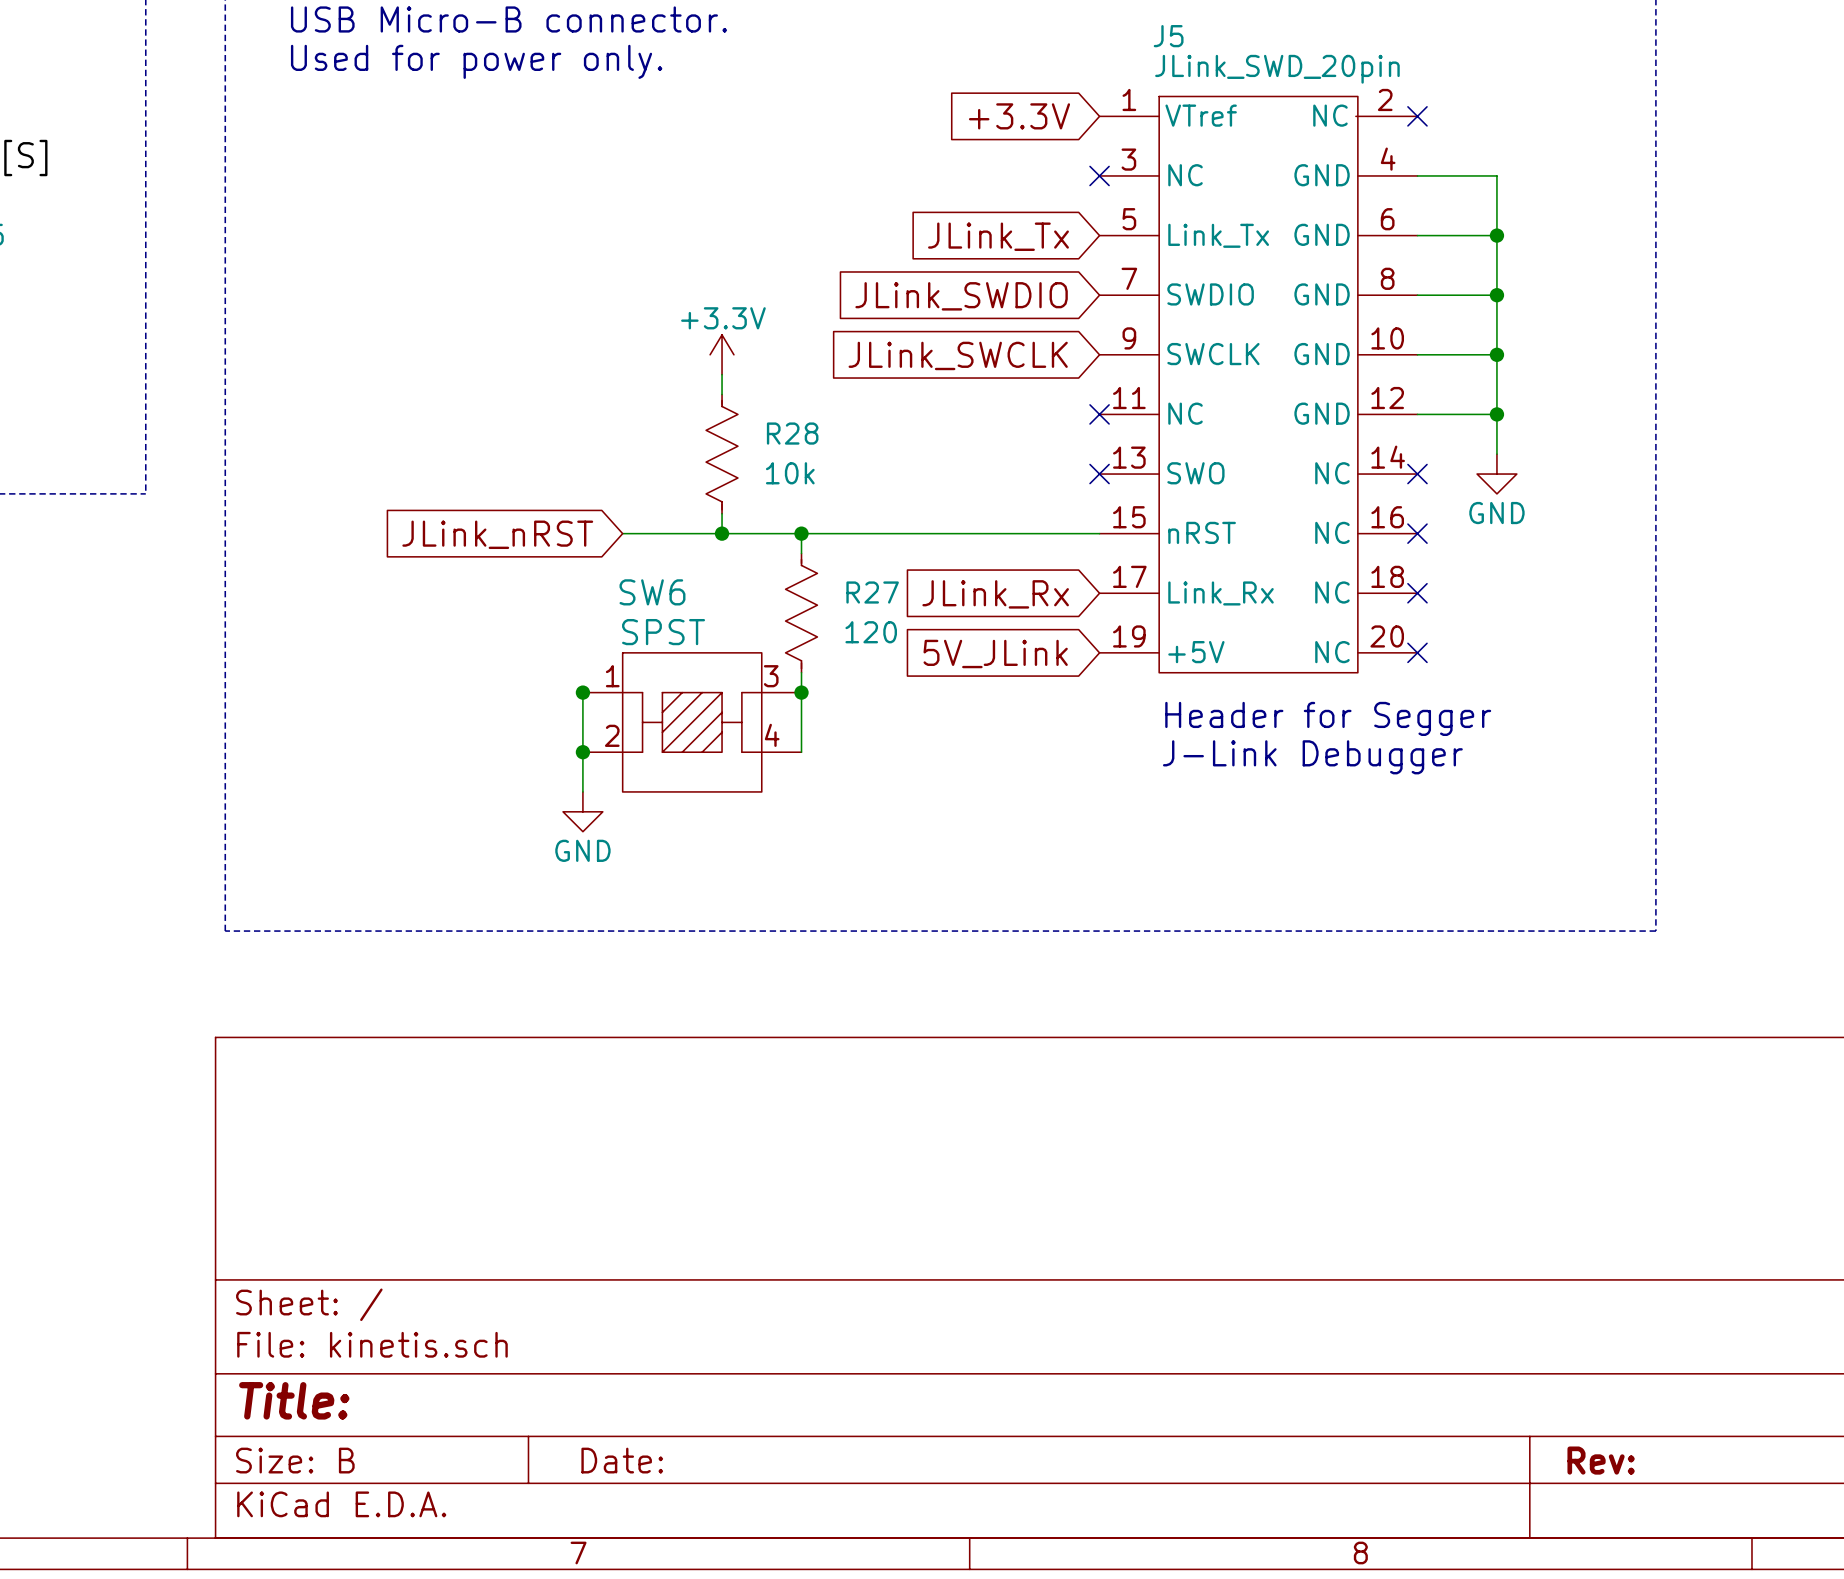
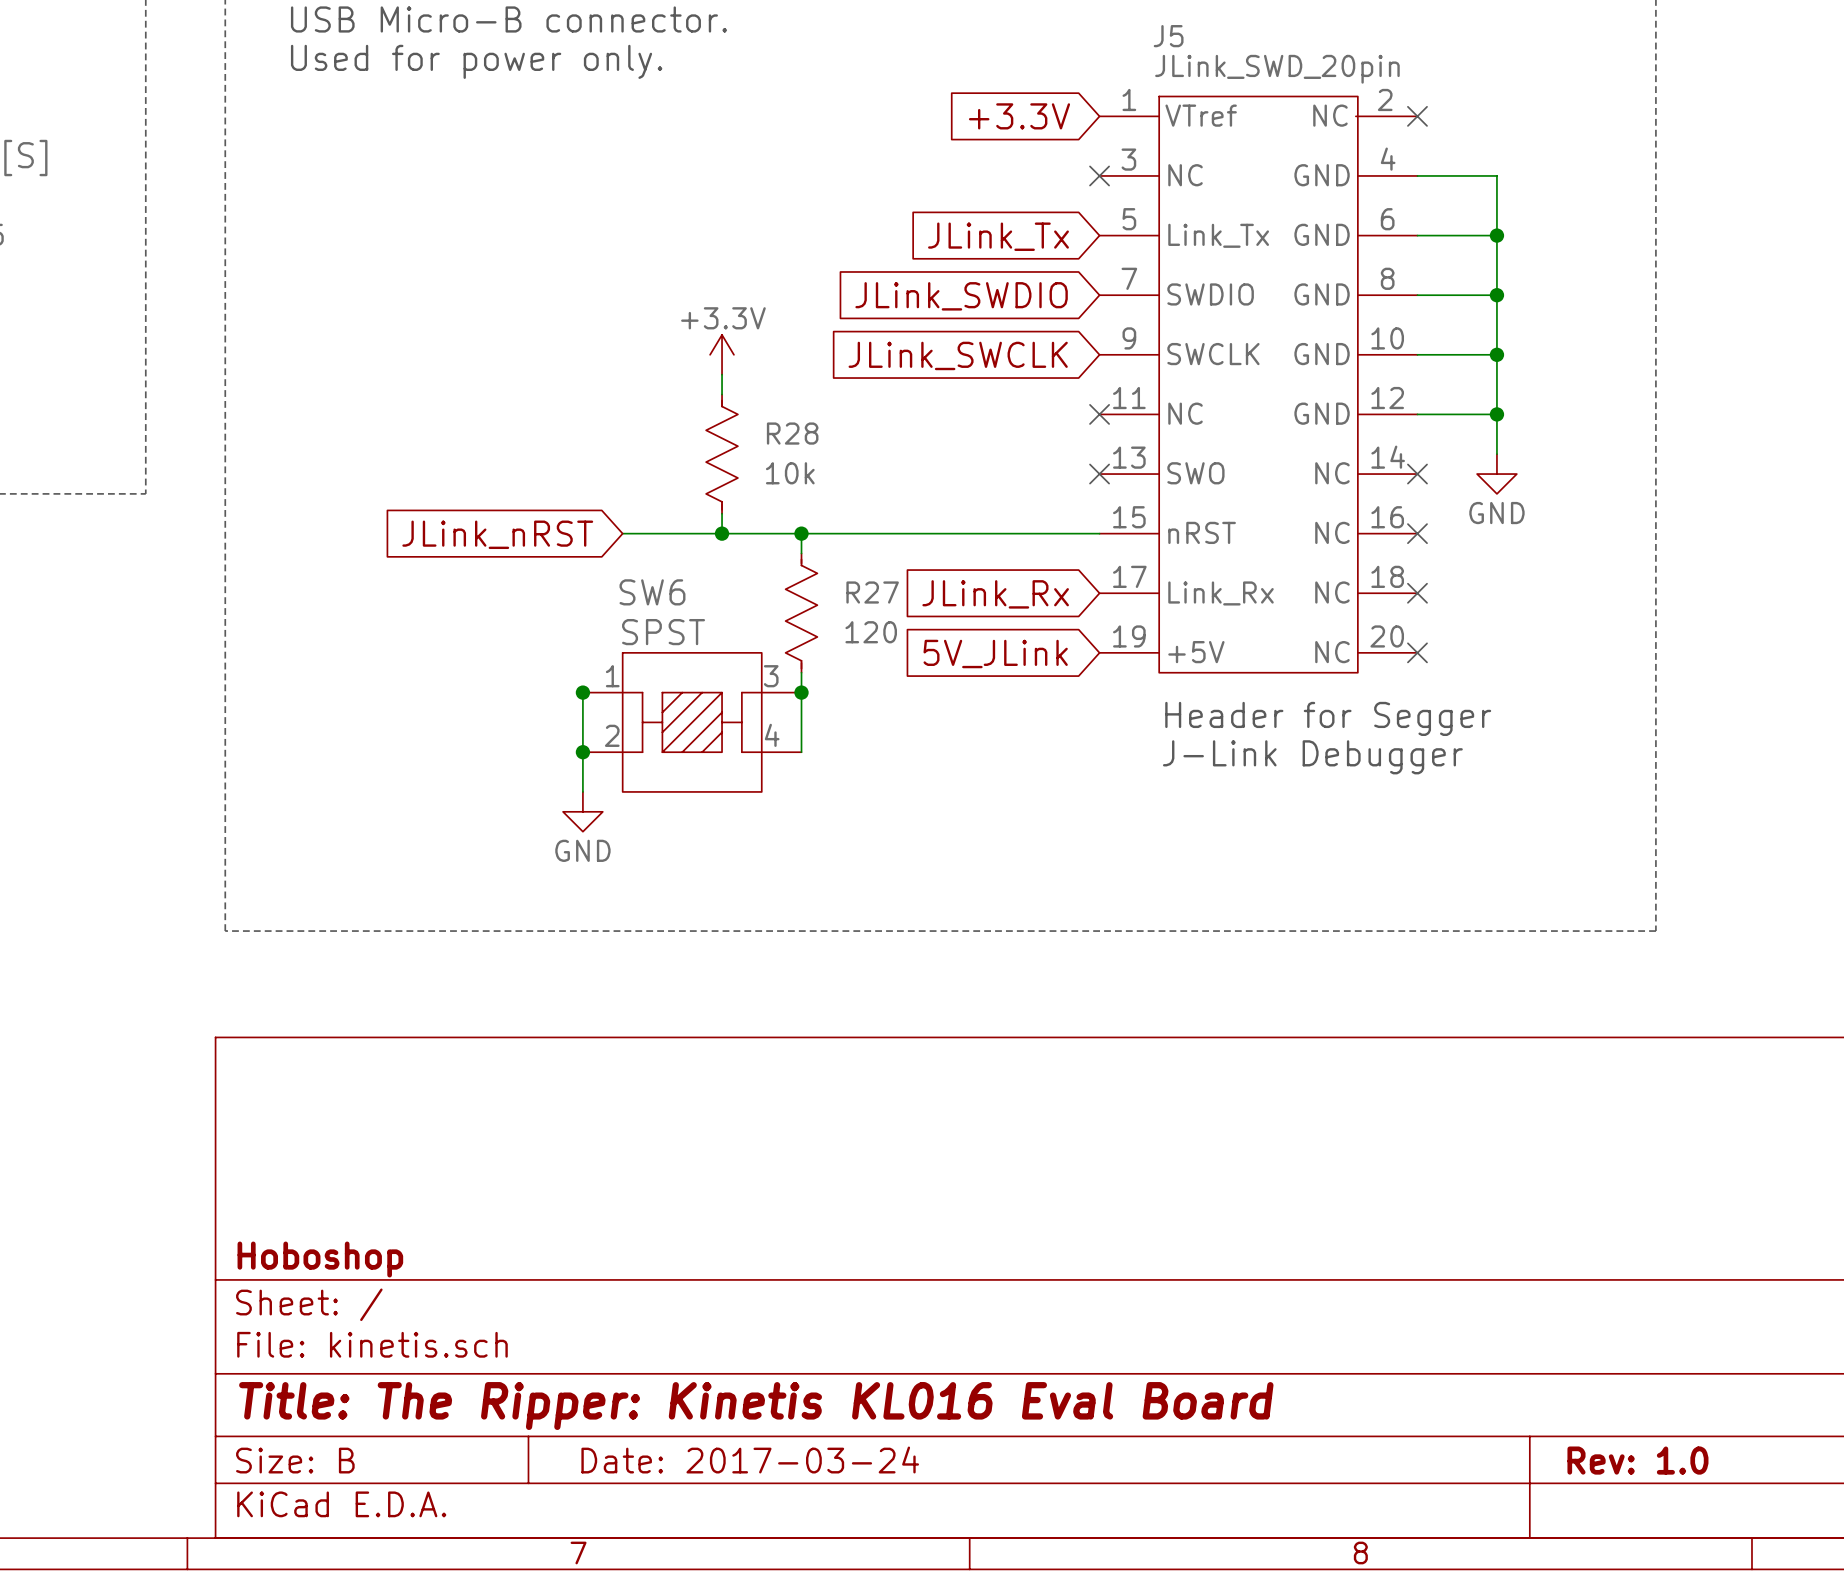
title block: none -> Hoboshop (320, 1259)
title block: Title: (294, 1400) -> Title: The Ripper: Kinetis KL016 Eval Board (756, 1406)
title block: Date: (622, 1460) -> Date: 2017-03-24 (750, 1460)
title block: Rev: (1601, 1460) -> Rev: 1.0 (1637, 1460)

